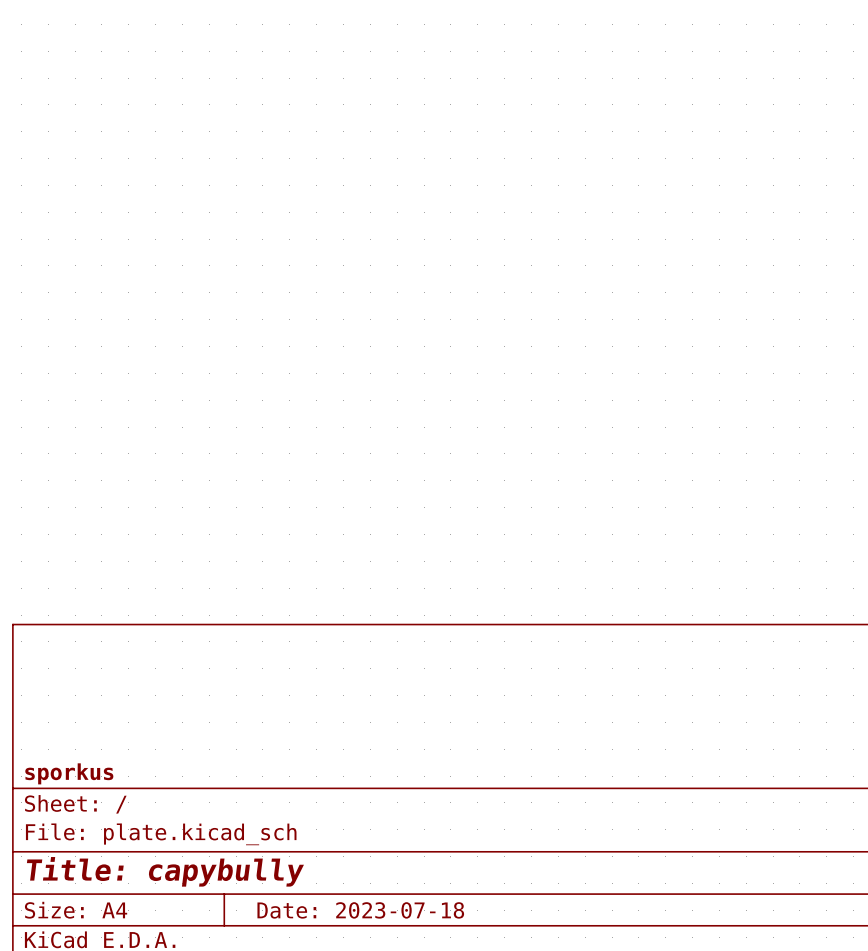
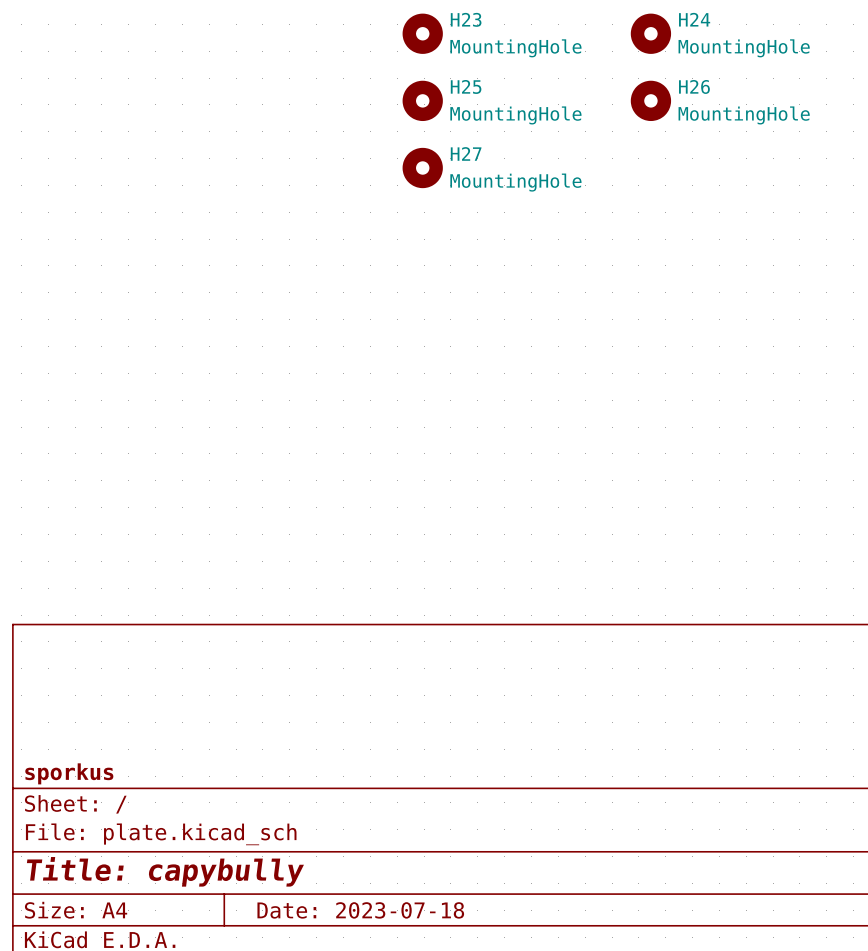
H23: none -> MountingHole (422, 33)
H24: none -> MountingHole (650, 33)
H25: none -> MountingHole (422, 100)
H26: none -> MountingHole (650, 100)
H27: none -> MountingHole (422, 168)

